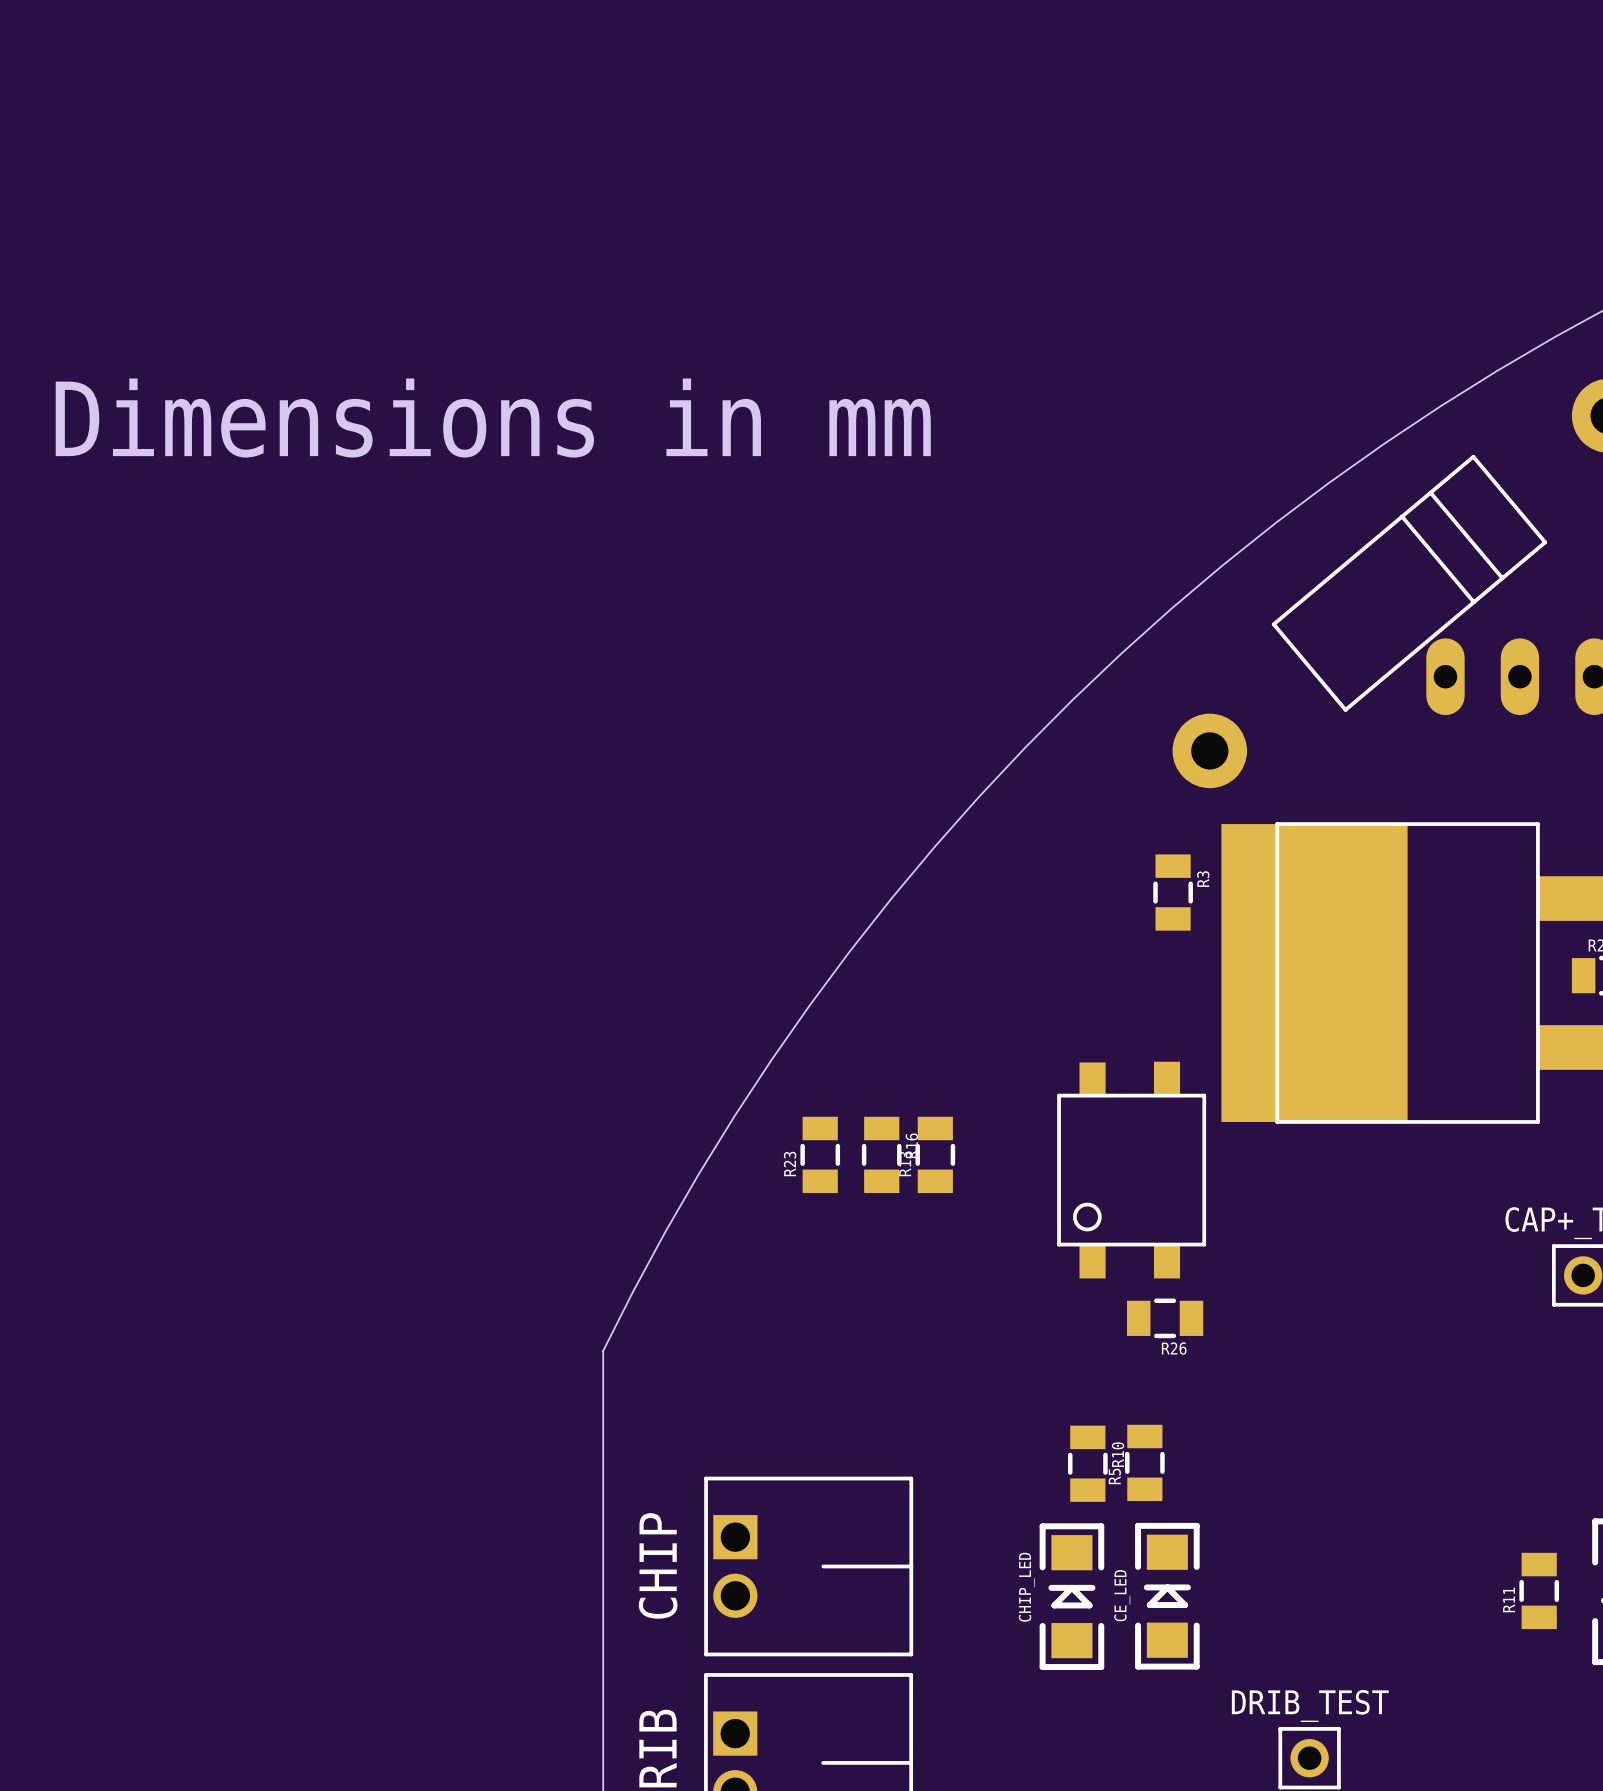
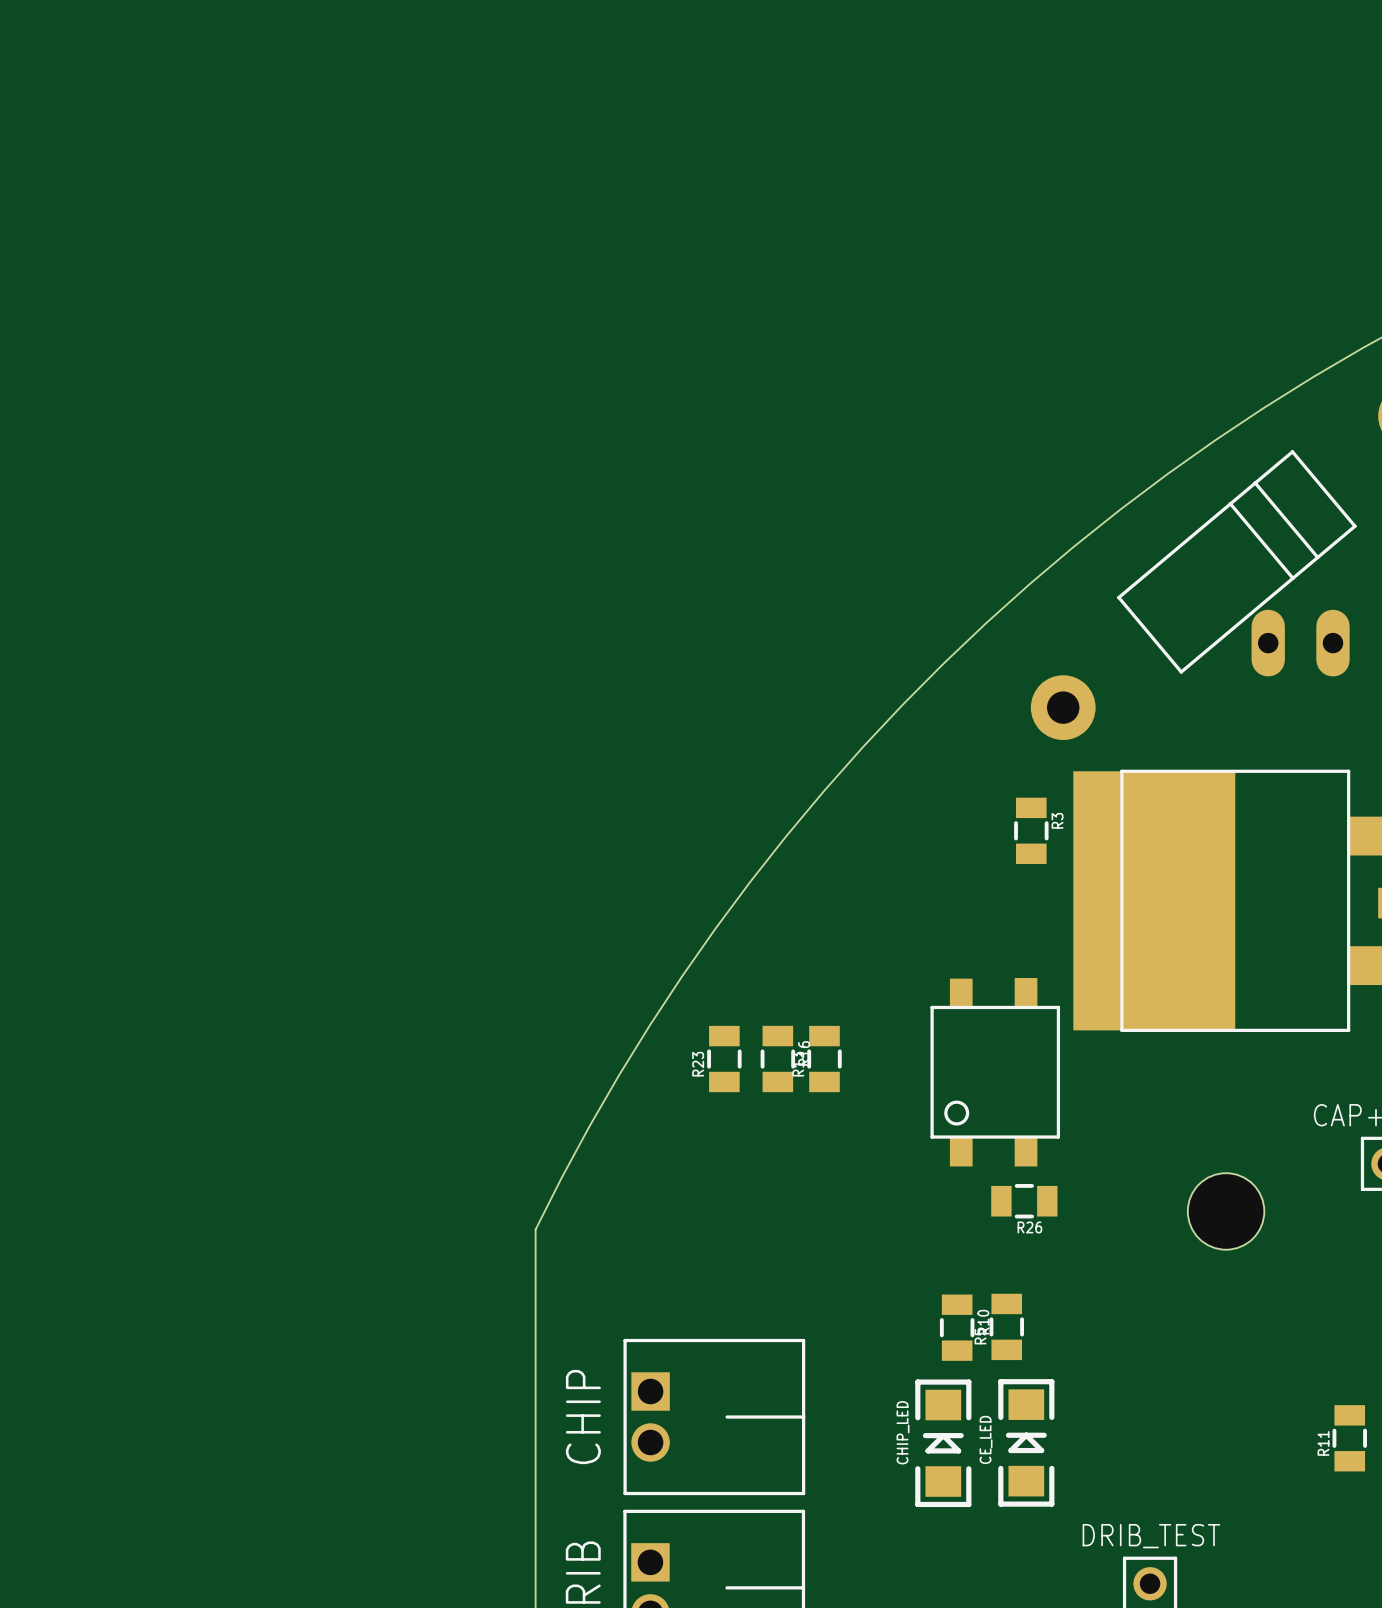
text: Dimensions in mm (493, 418) -> none
hole: none -> (1226, 1211)

